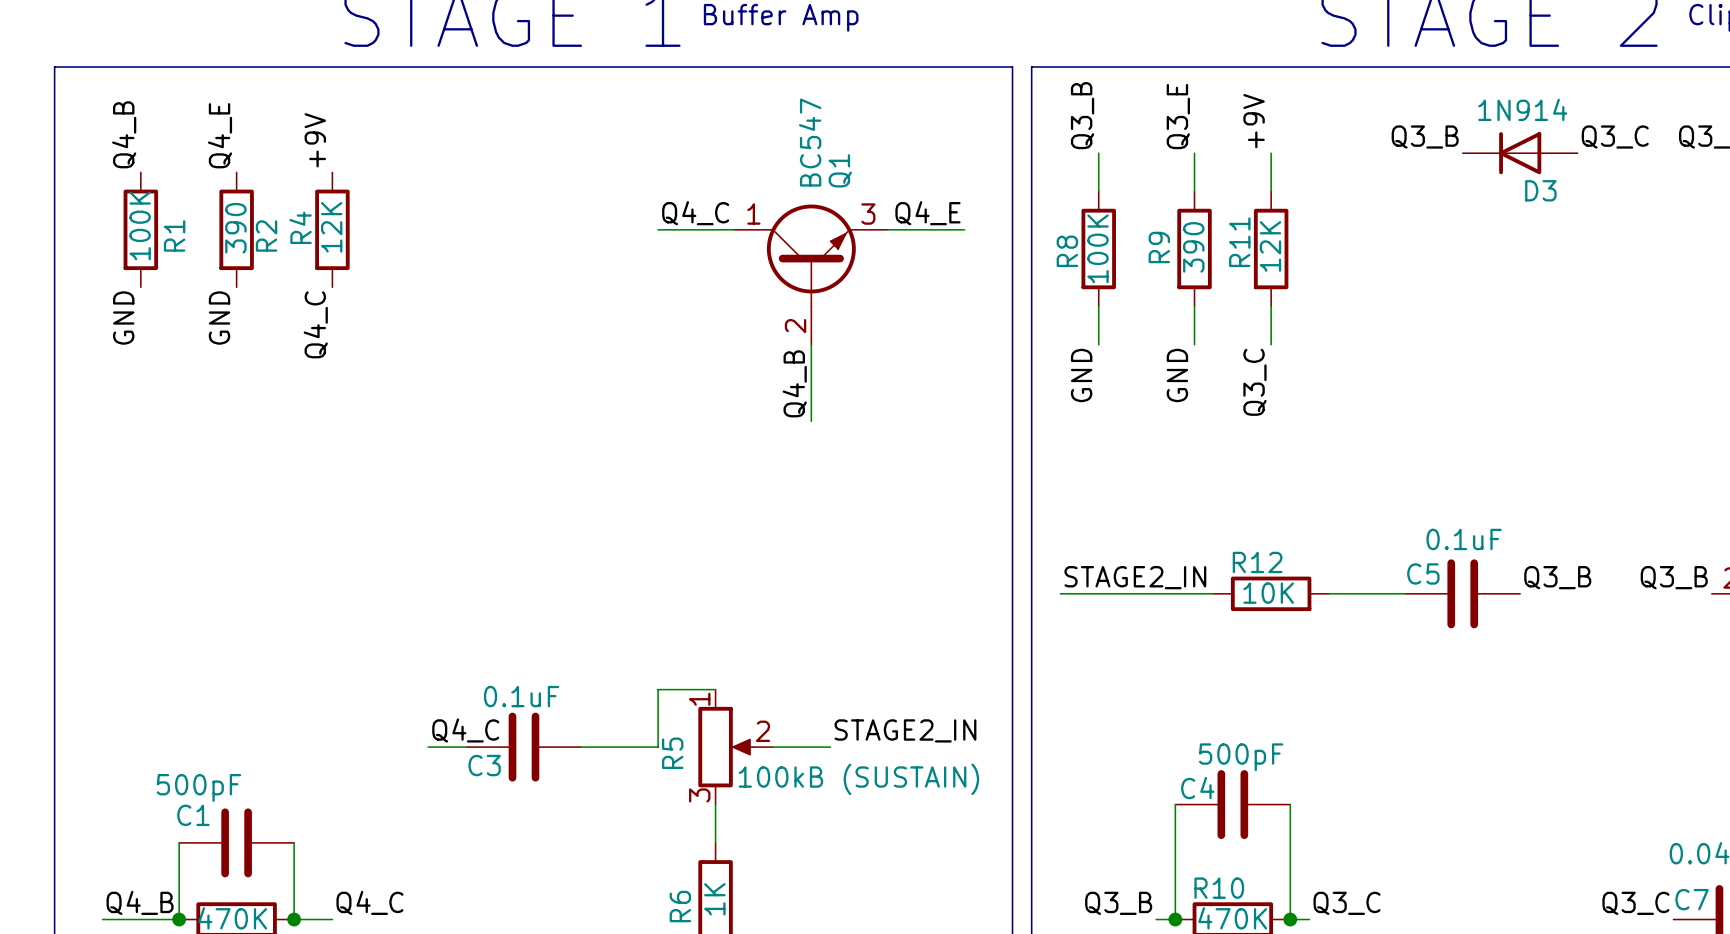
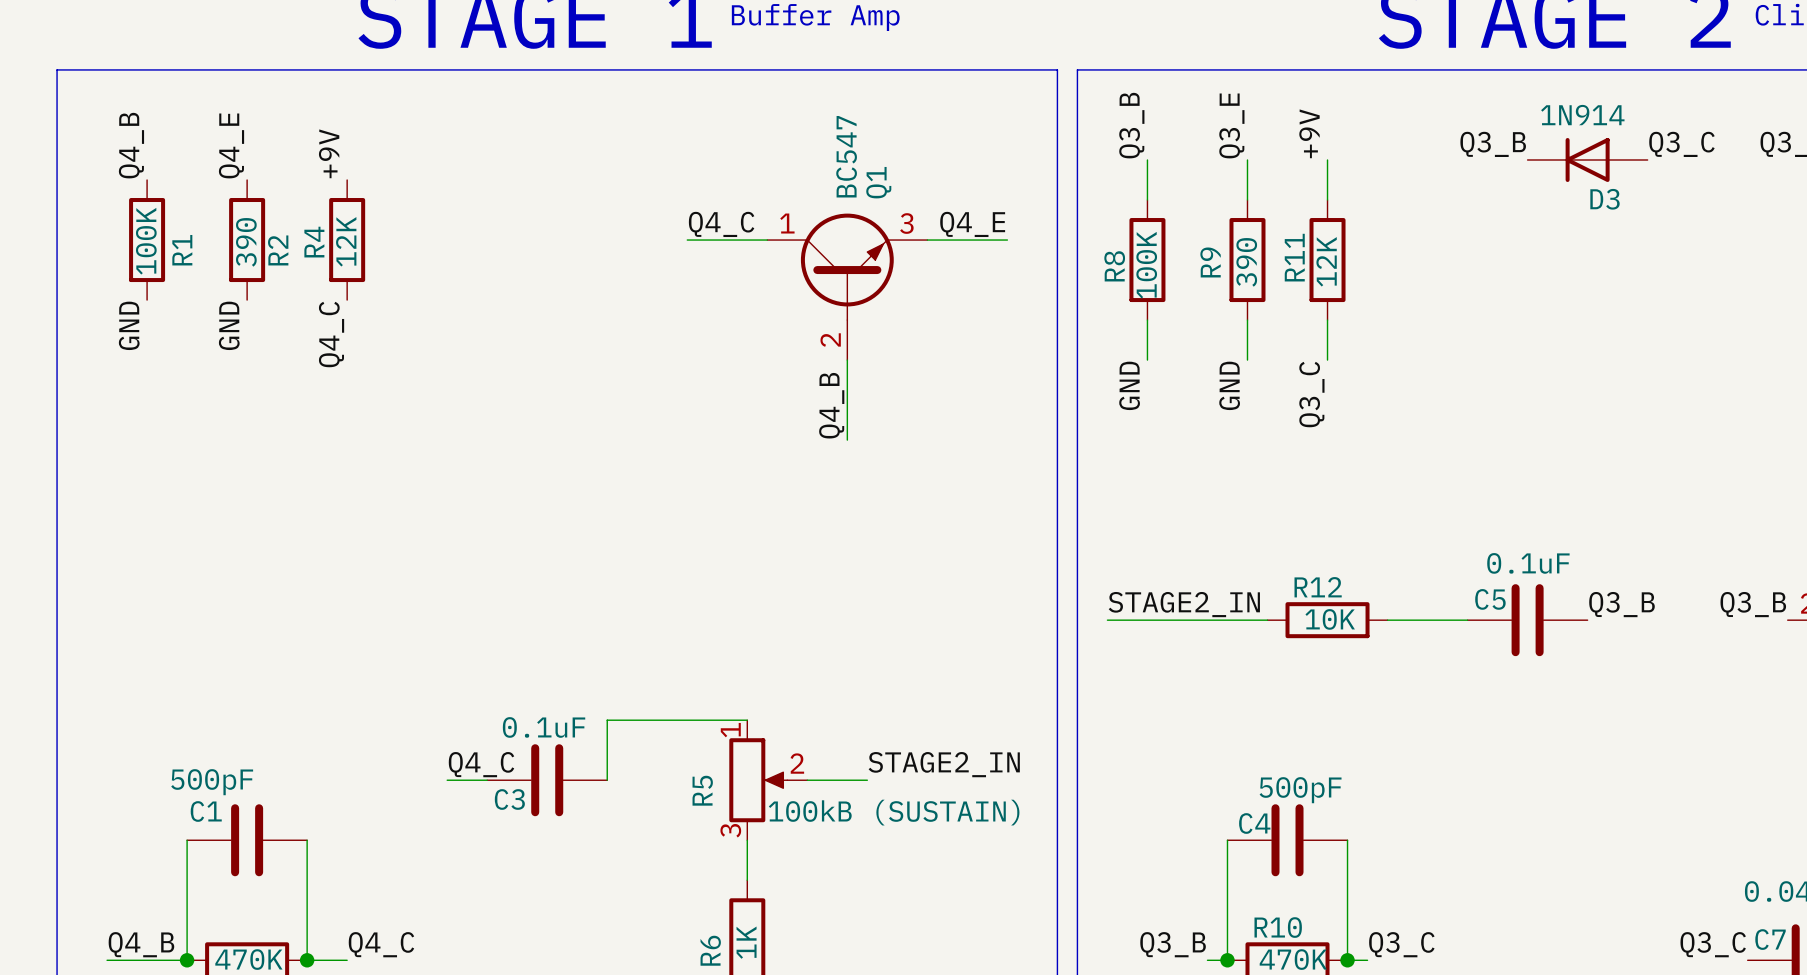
wire: (658, 689) (658, 747) (581, 747) -> (687, 720) (607, 720) (607, 780)
wire: none -> (187, 840) (187, 880)
wire: none -> (307, 840) (307, 880)
C1 position: (236, 842) -> (247, 840)

